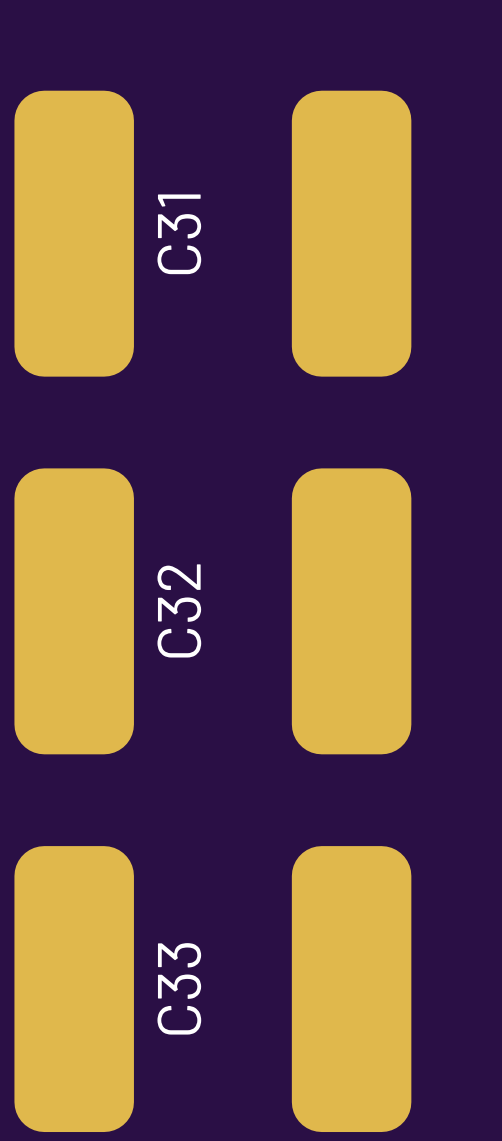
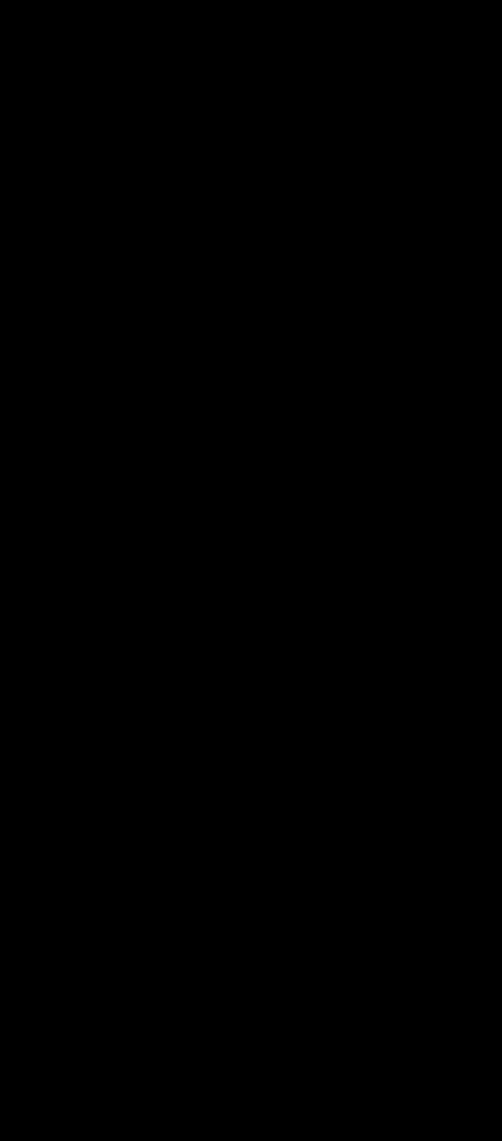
C31: (212, 233) -> none
C32: (212, 611) -> none
C33: (212, 989) -> none

